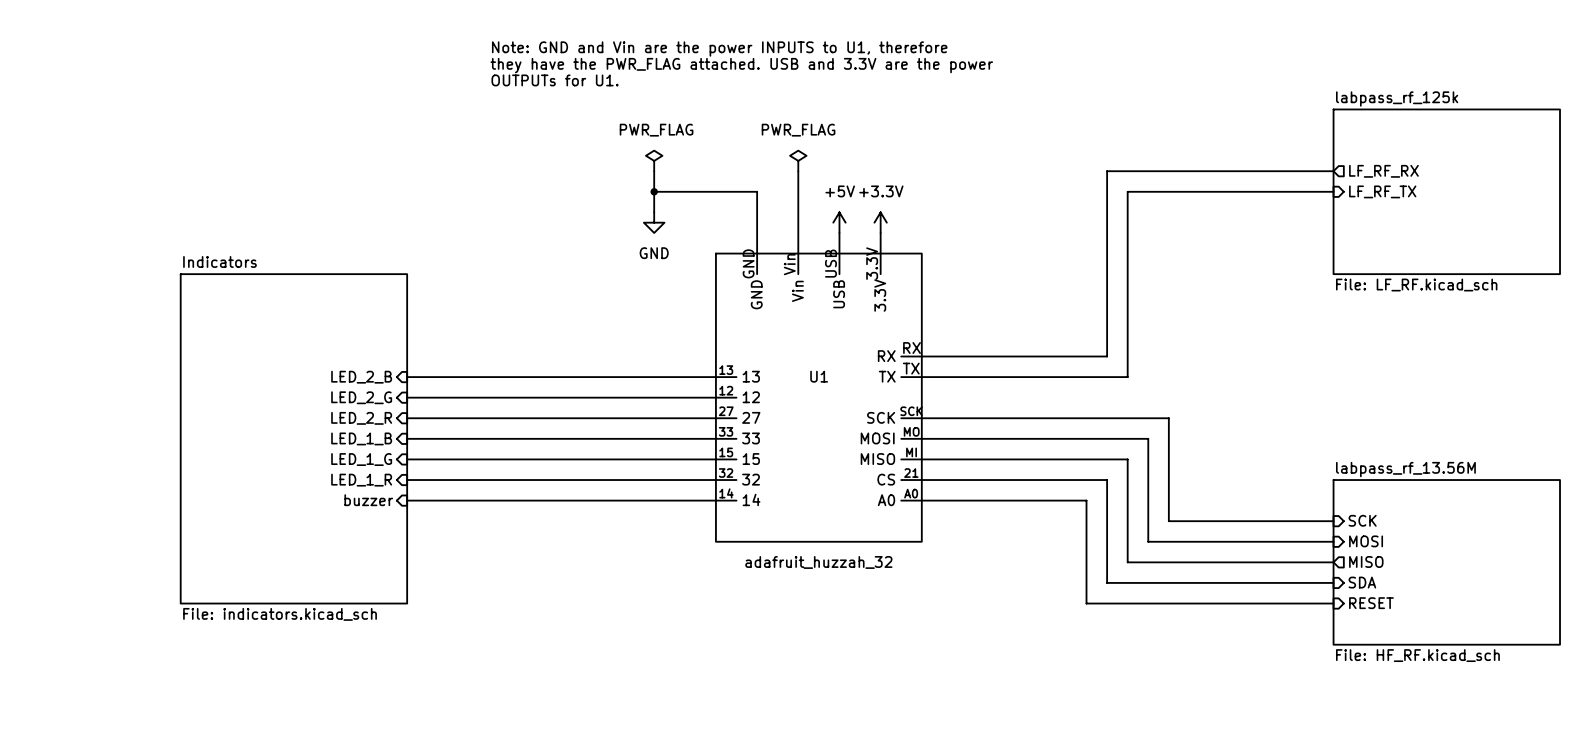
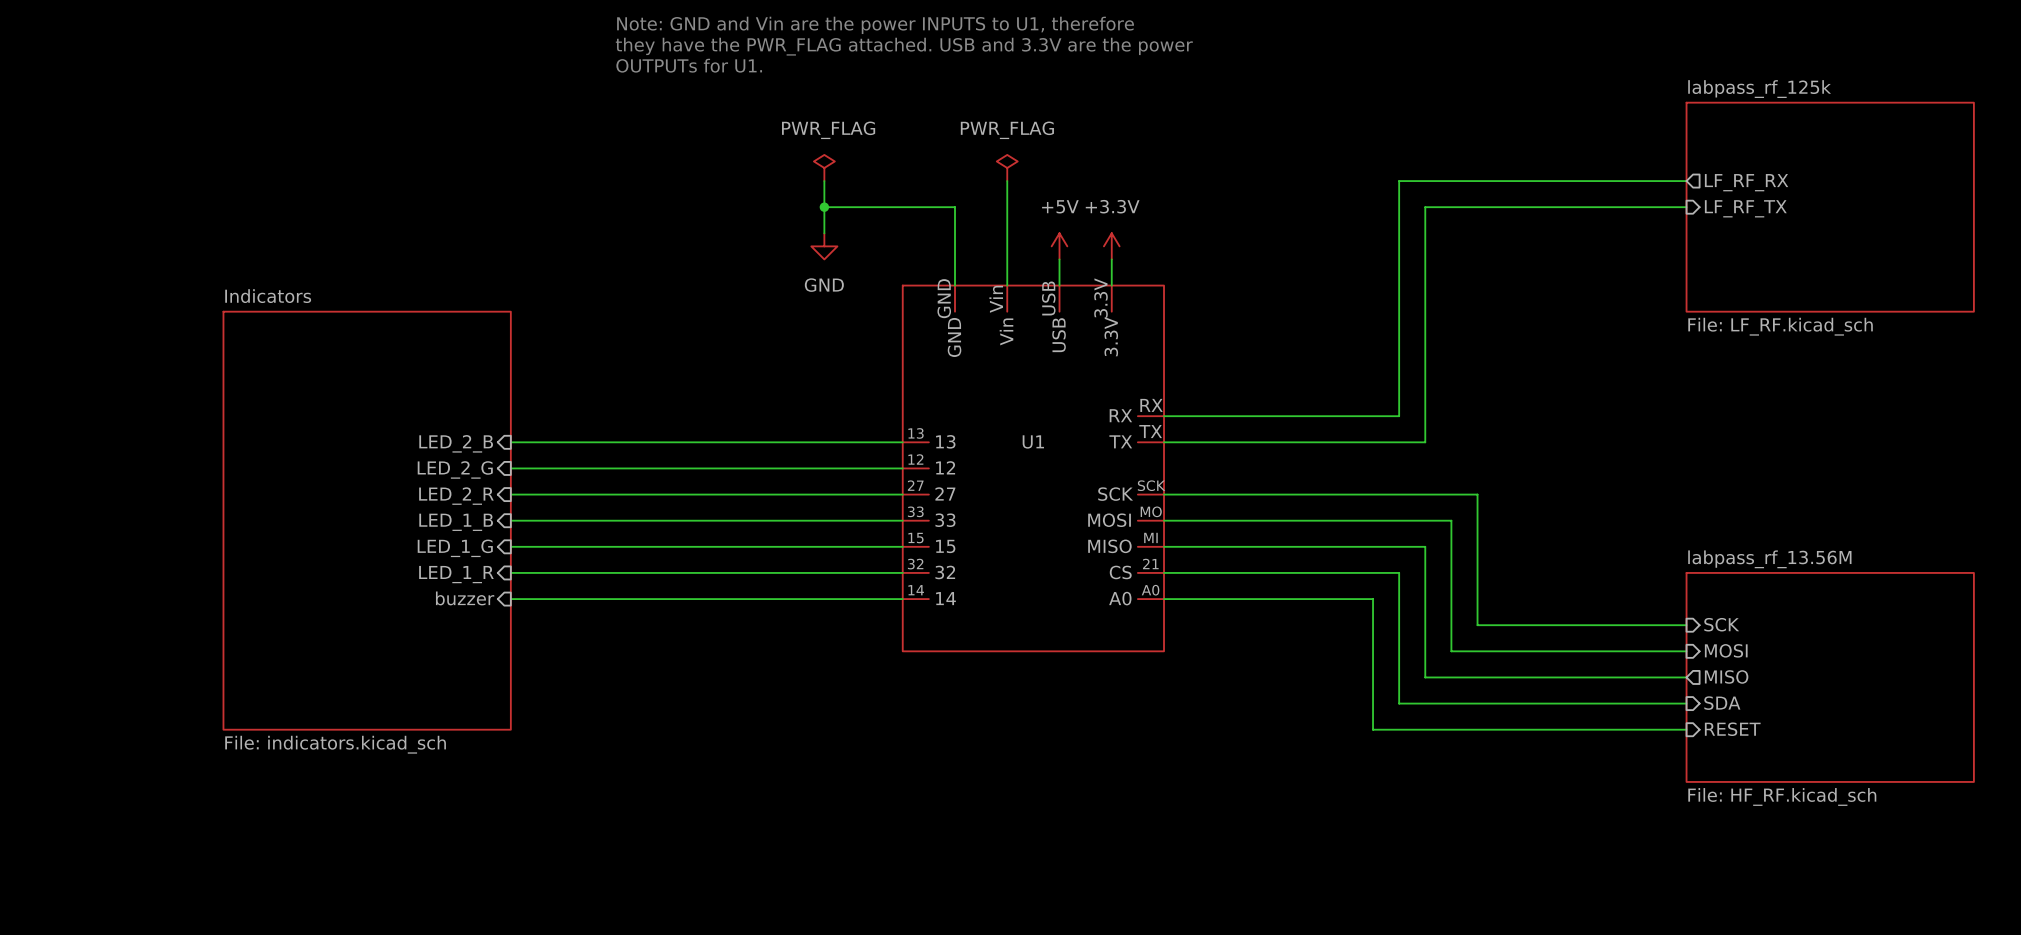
U1 value: adafruit_huzzah_32 (818, 562) -> none

